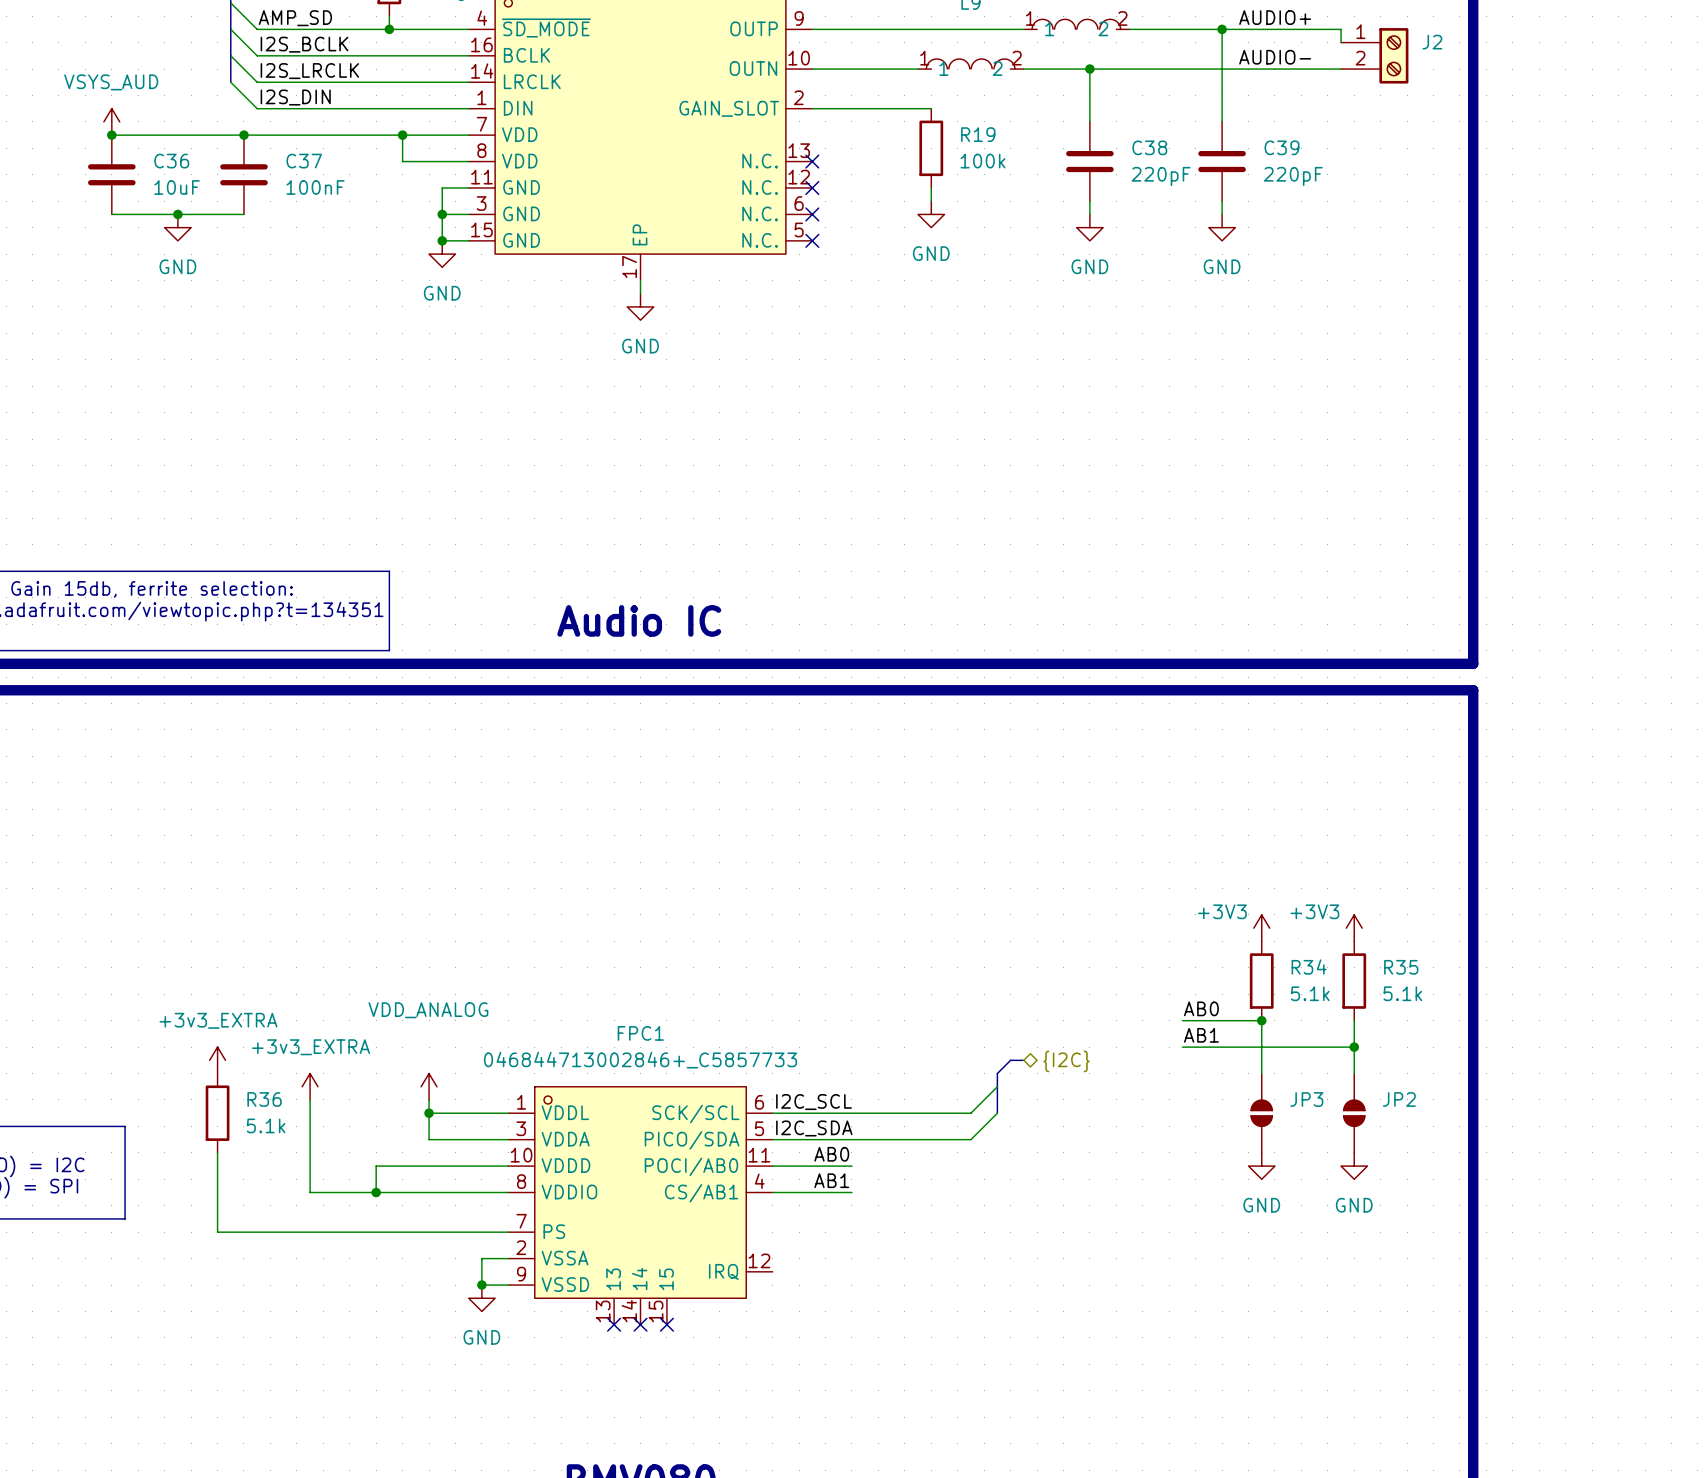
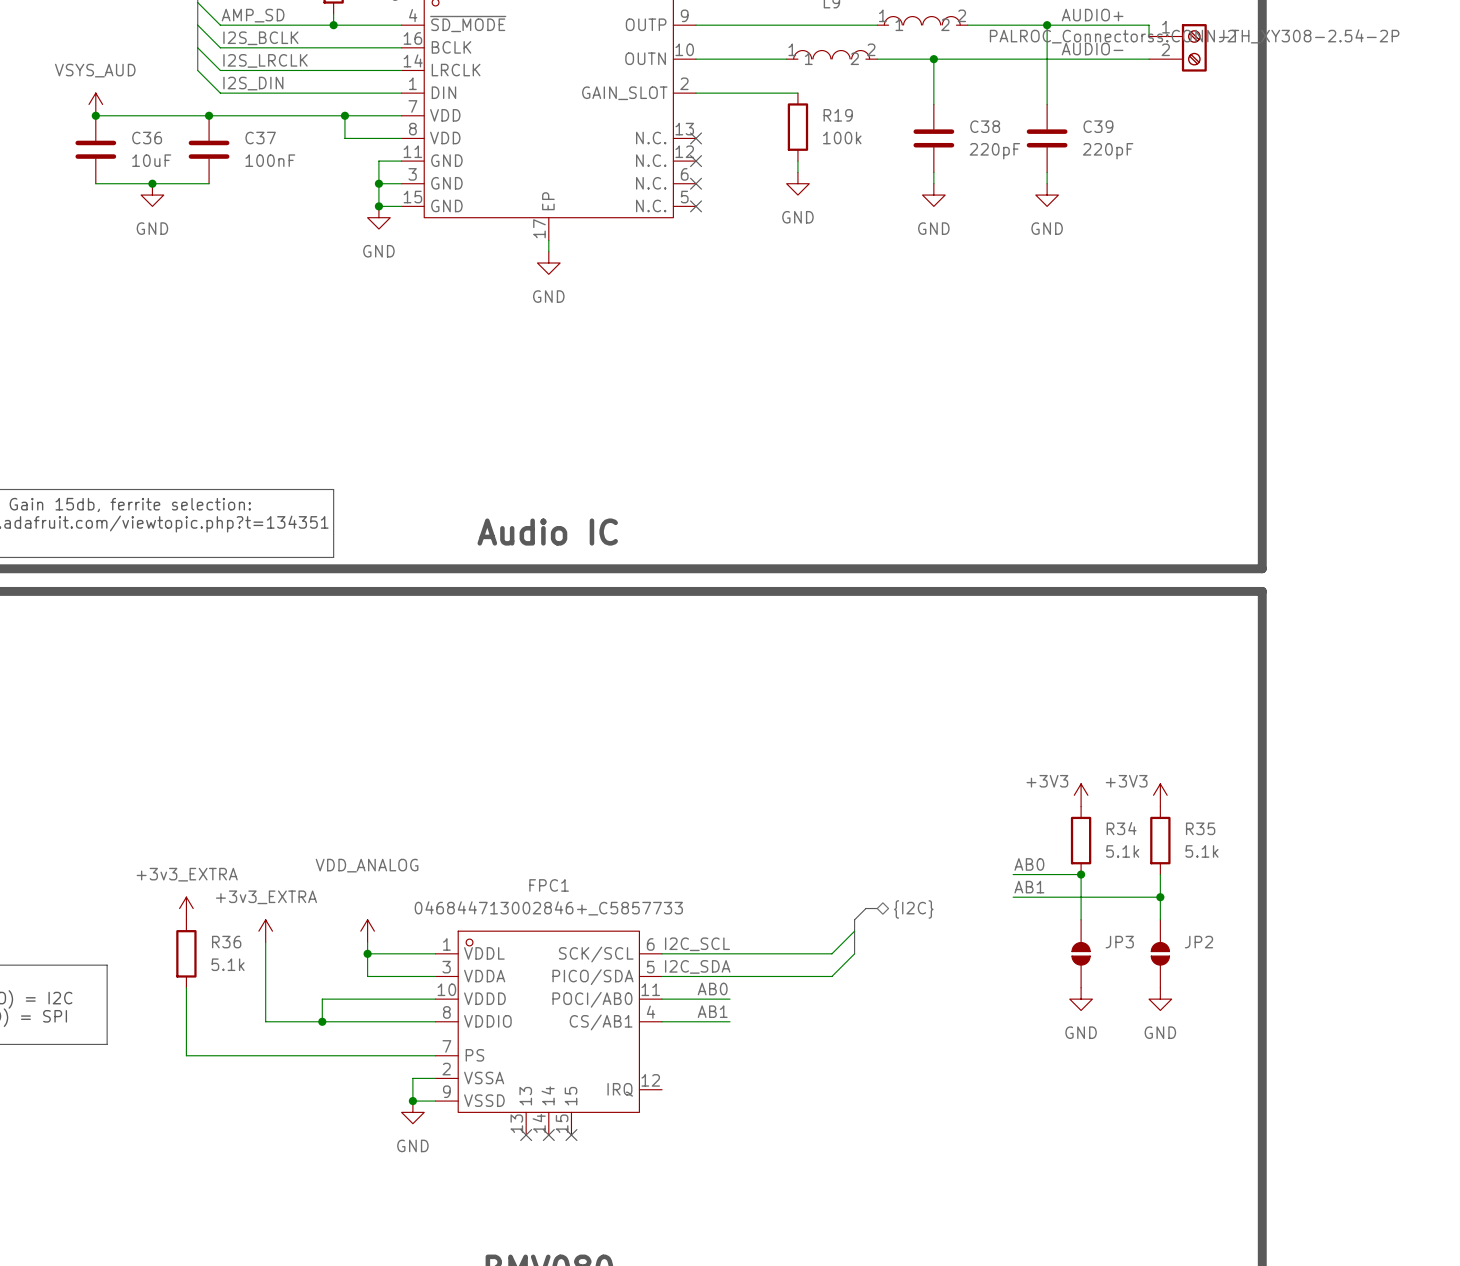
J2 text: none -> PALROC_Connectorss:CONN-TH_XY308-2.54-2P (1194, 36)

